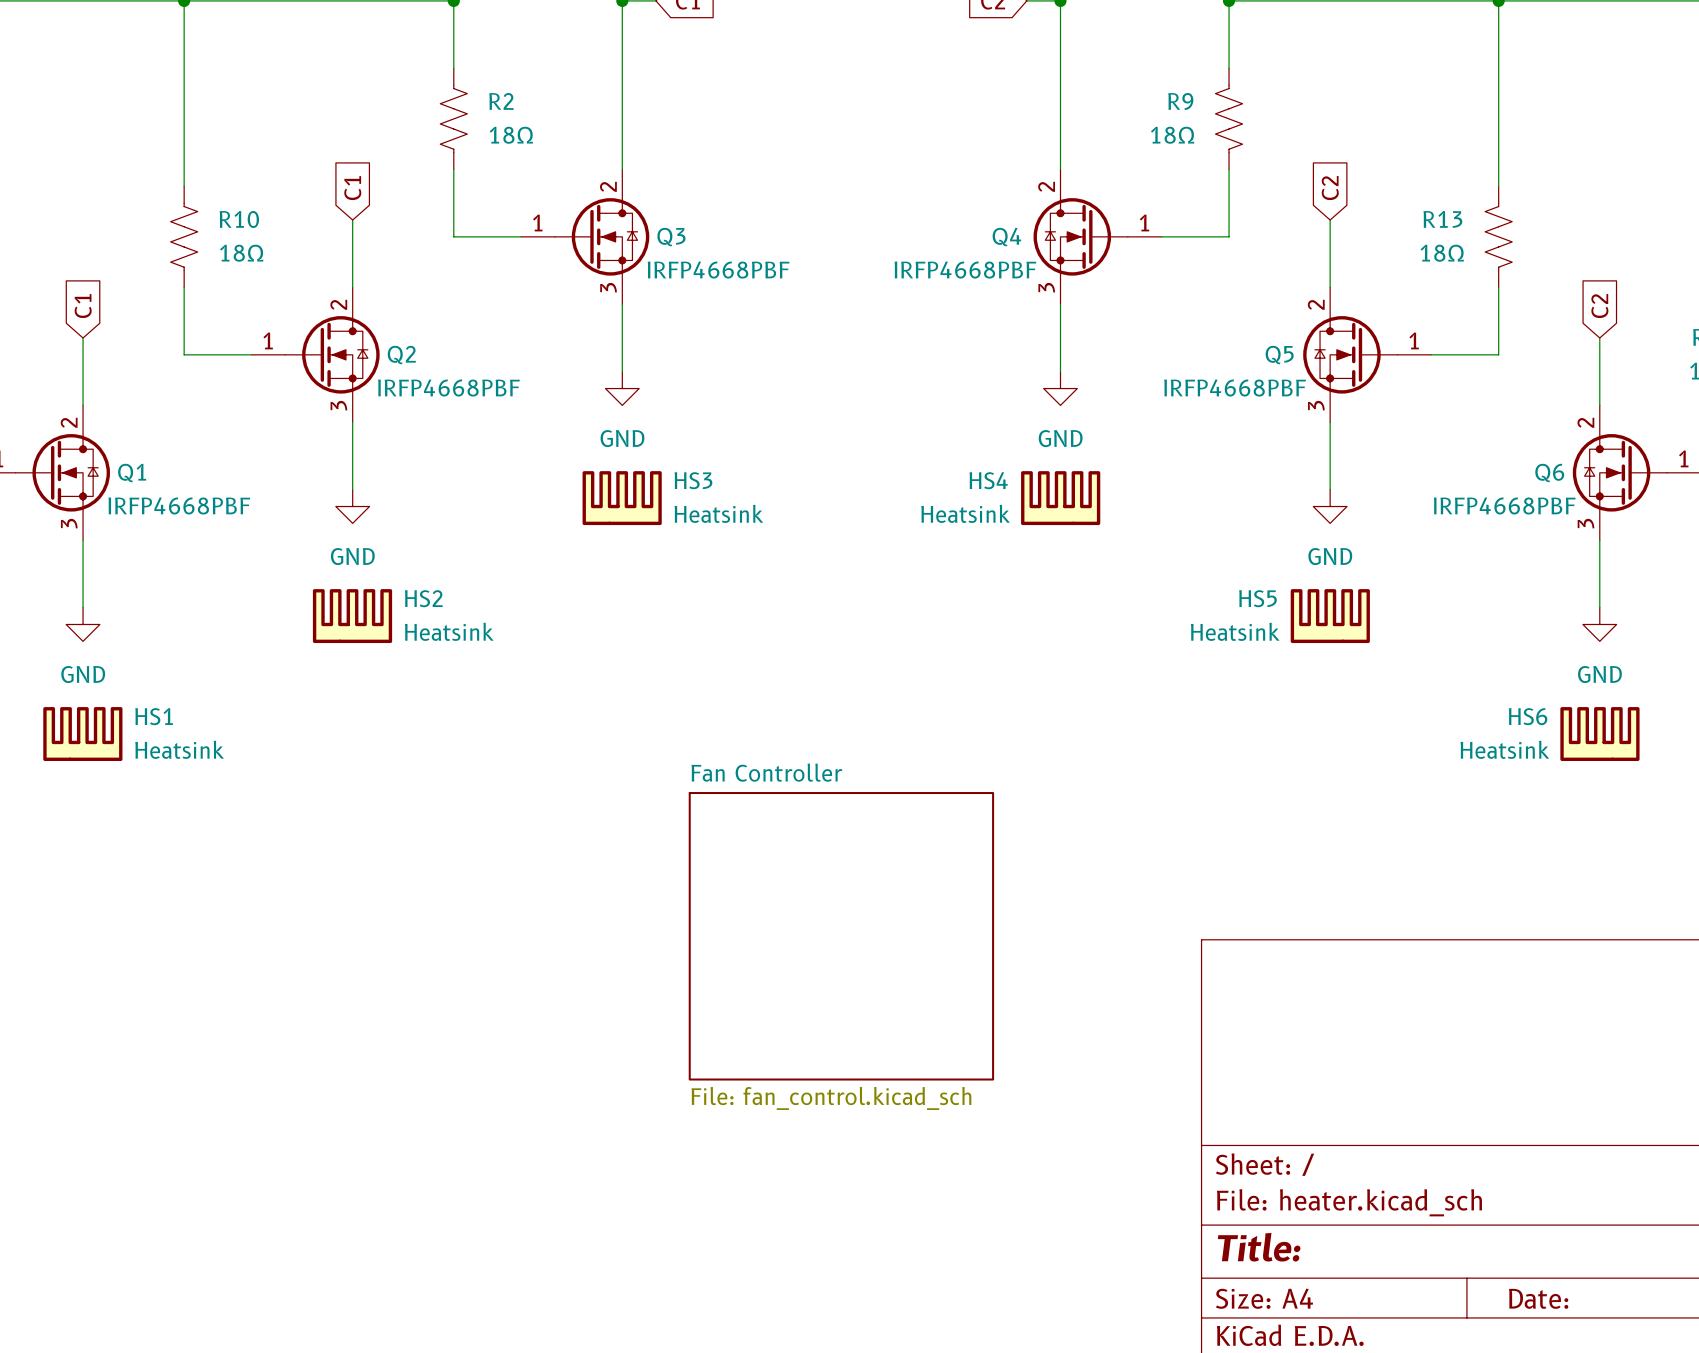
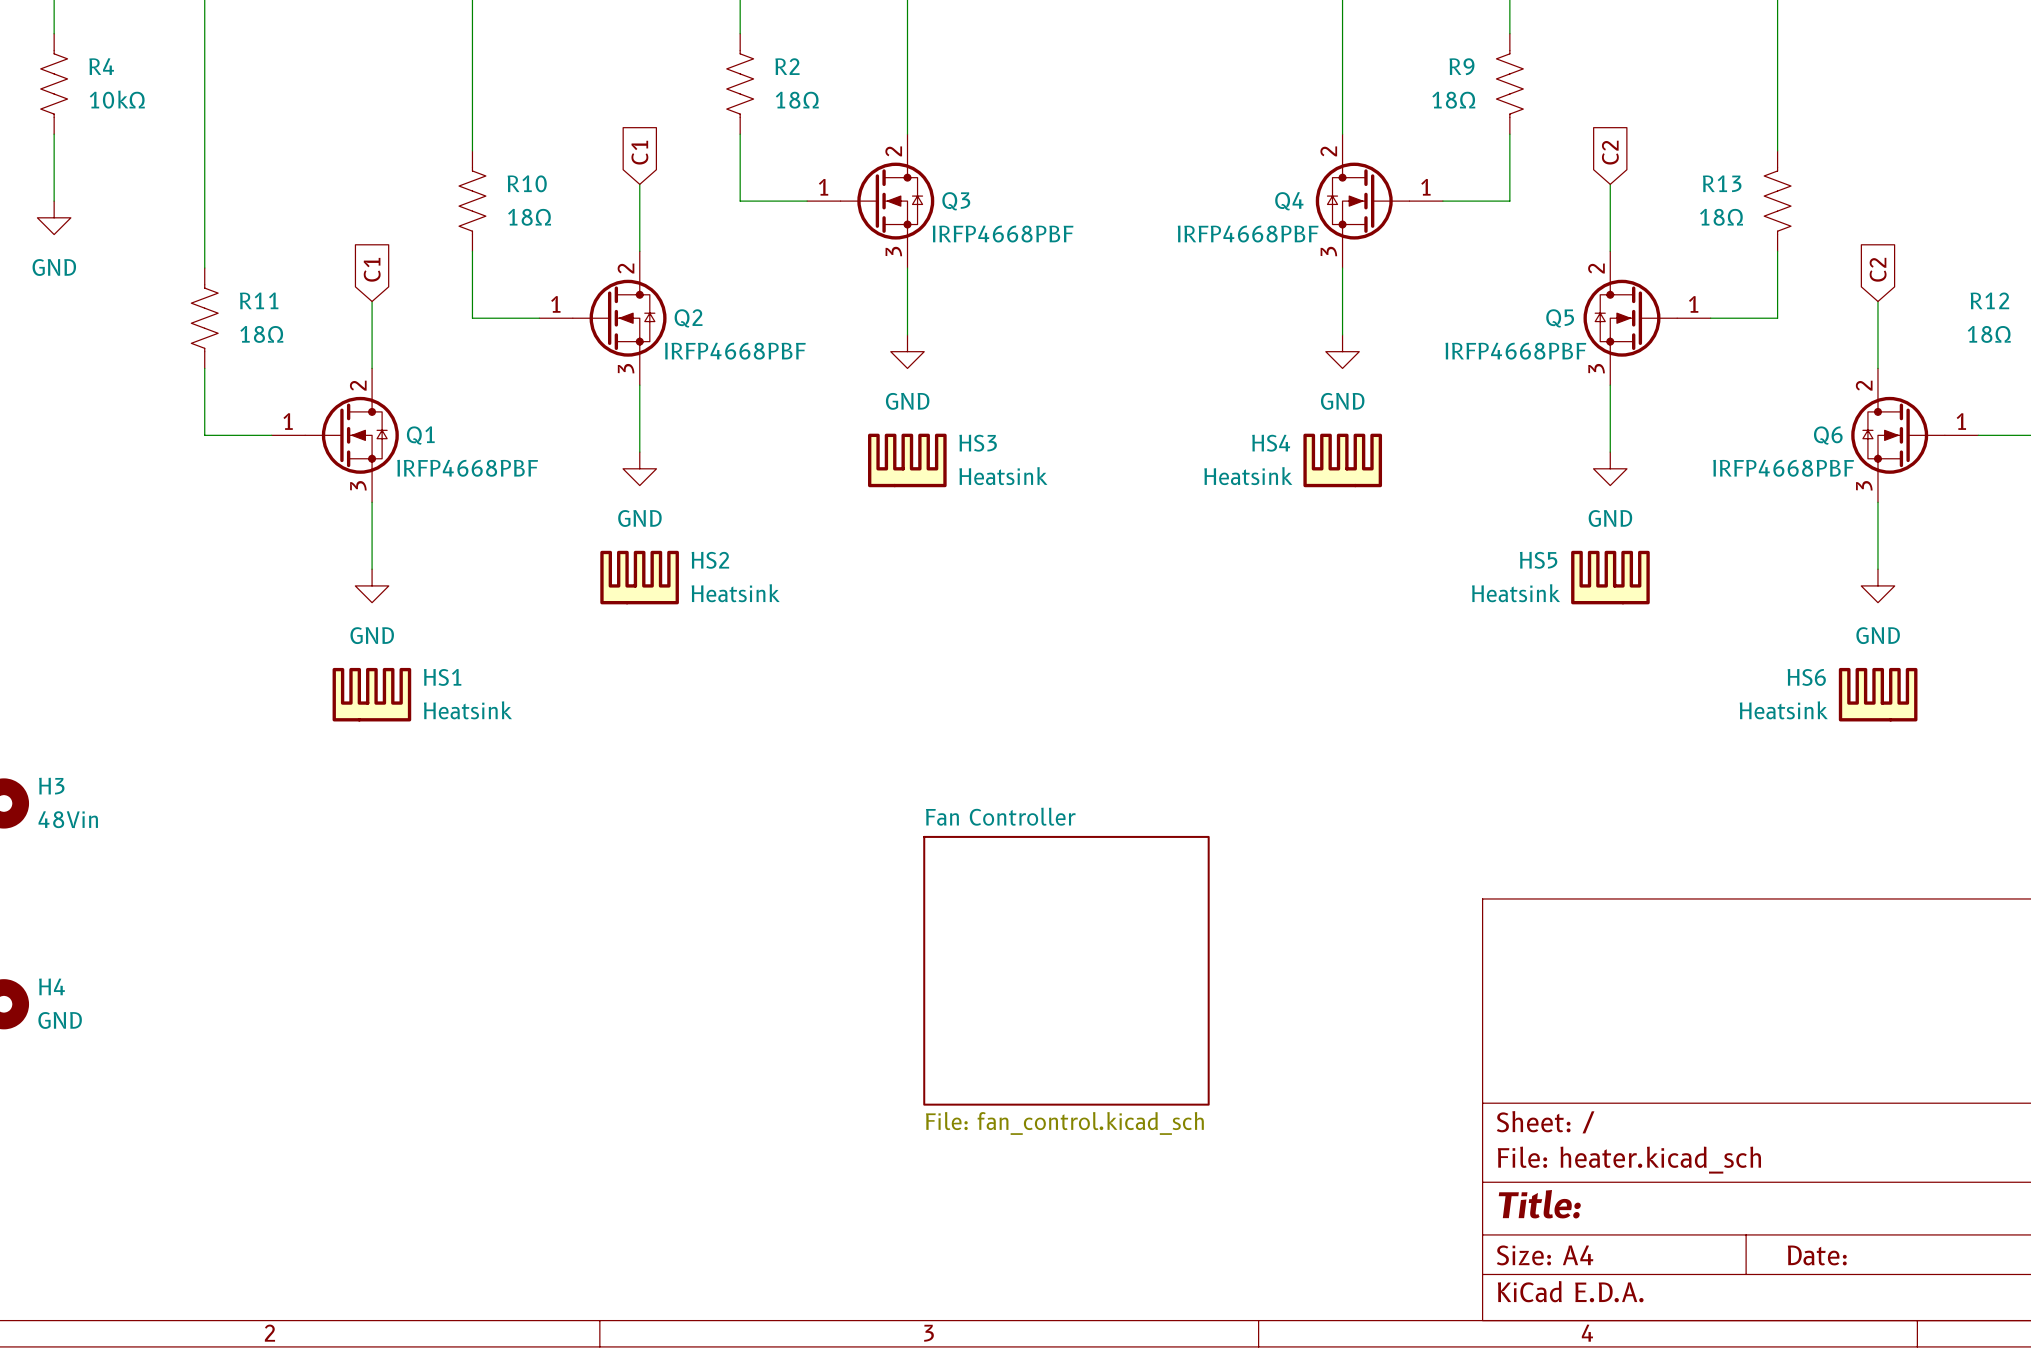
sheet Fan Controller: File: fan_control.kicad_sch (841, 936) -> none
sheet Fan Controller: none -> File: fan_control.kicad_sch (1066, 970)

